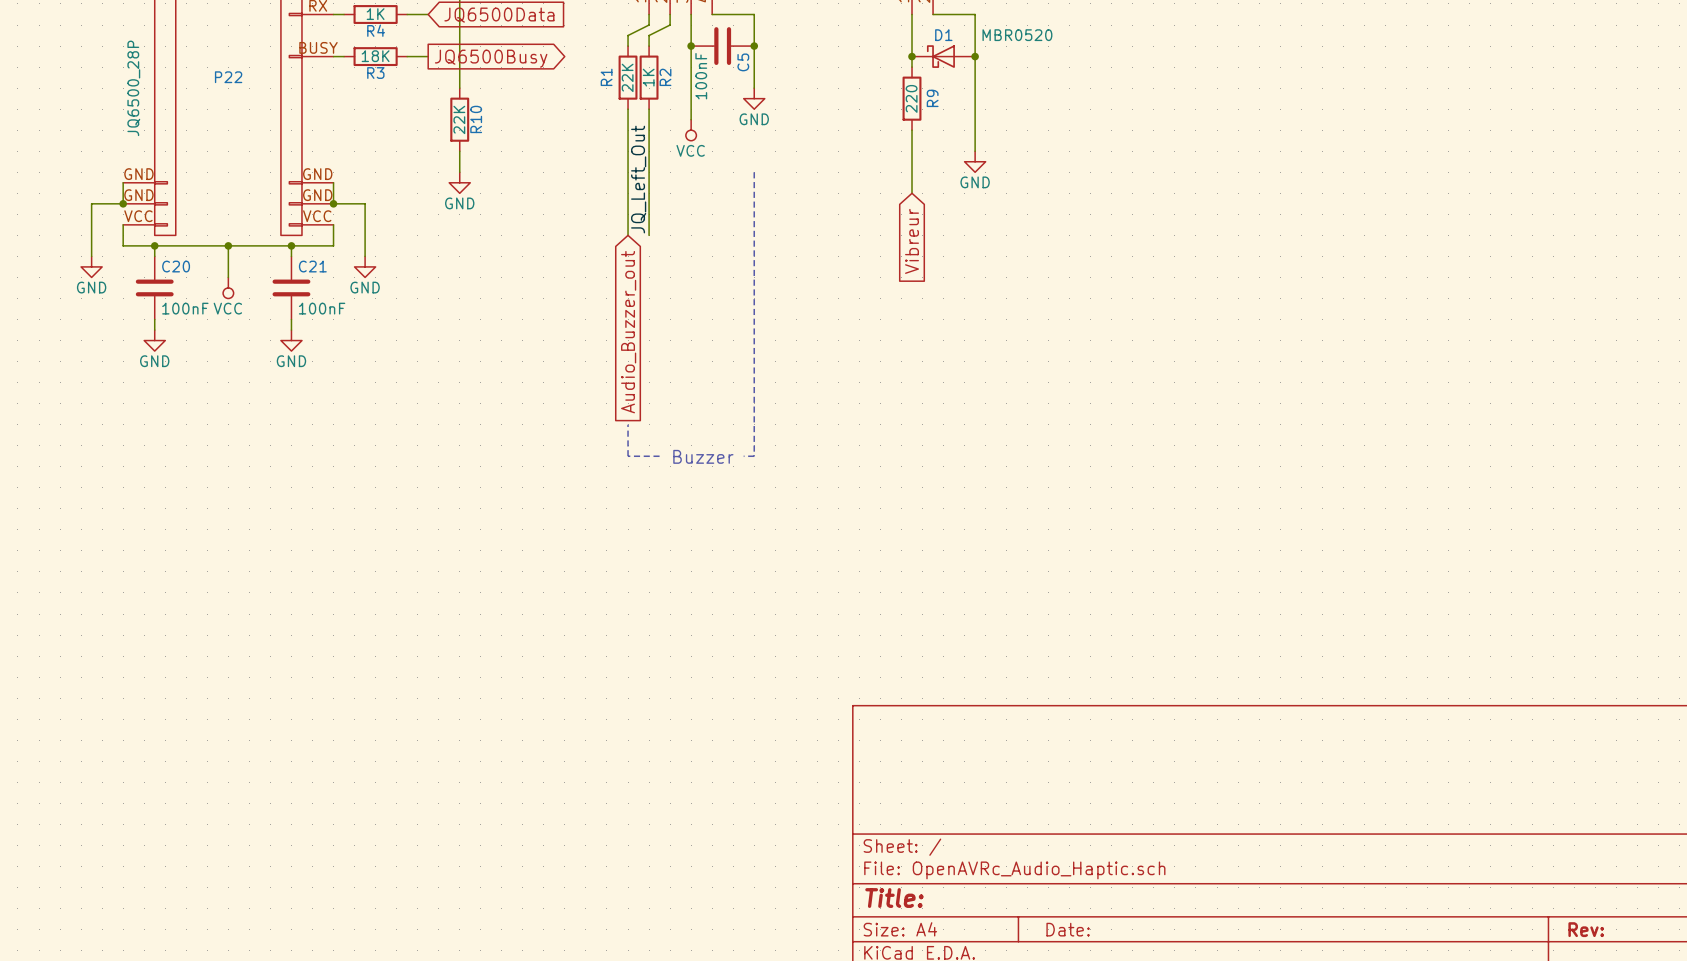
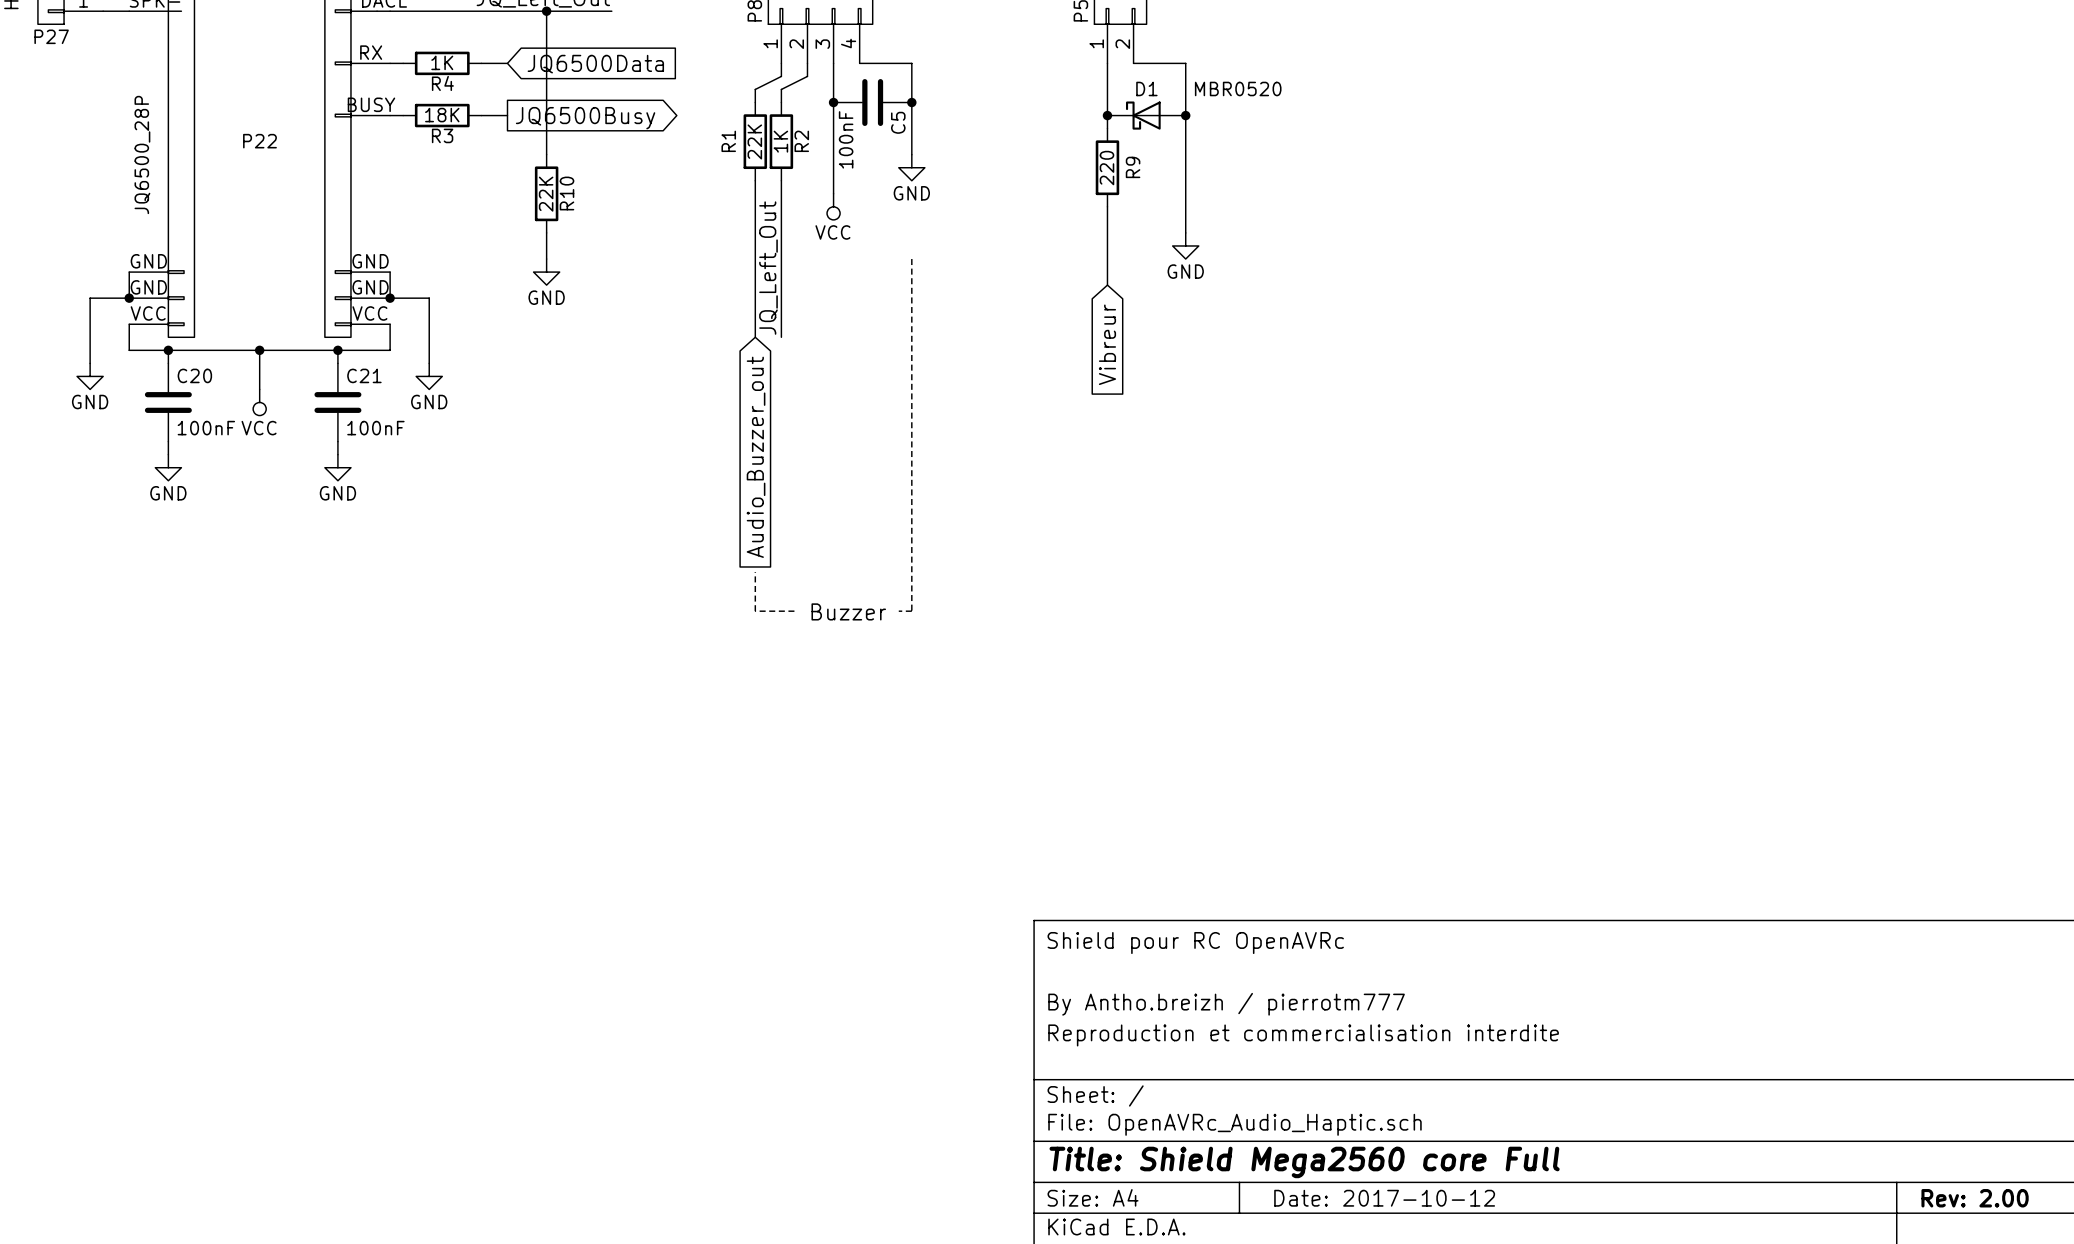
title block: none -> Shield pour RC OpenAVRc (1195, 943)
title block: none -> By Antho.breizh / pierrotm777 (1226, 1004)
title block: none -> Reproduction et commercialisation interdite (1303, 1035)
title block: Title: (894, 898) -> Title: Shield Mega2560 core Full (1304, 1162)
title block: Date: (1068, 929) -> Date: 2017-10-12 (1384, 1198)
title block: Rev: (1586, 929) -> Rev: 2.00 (1975, 1198)

